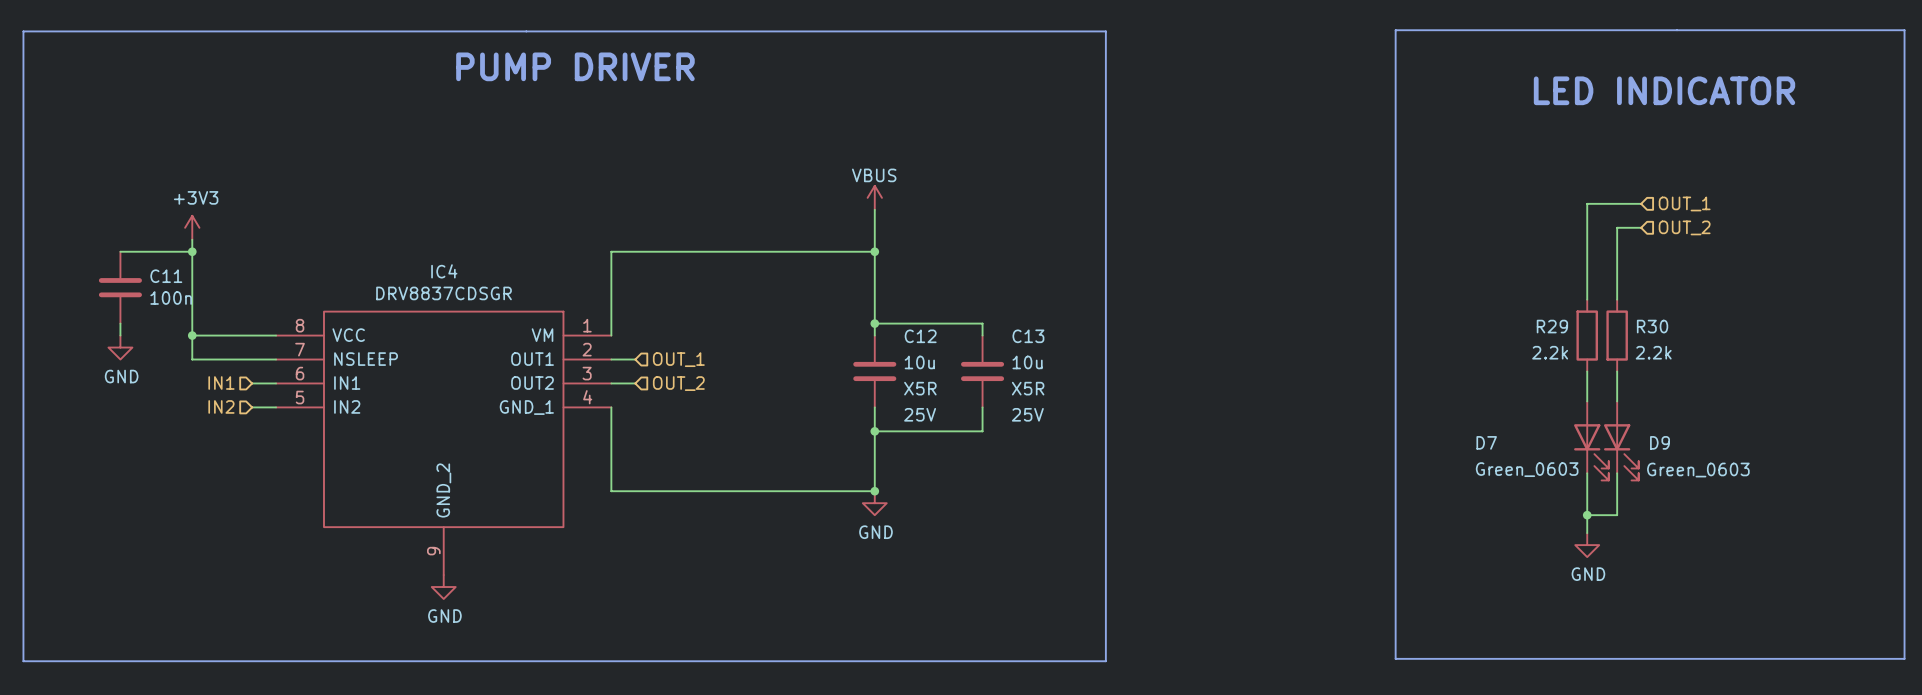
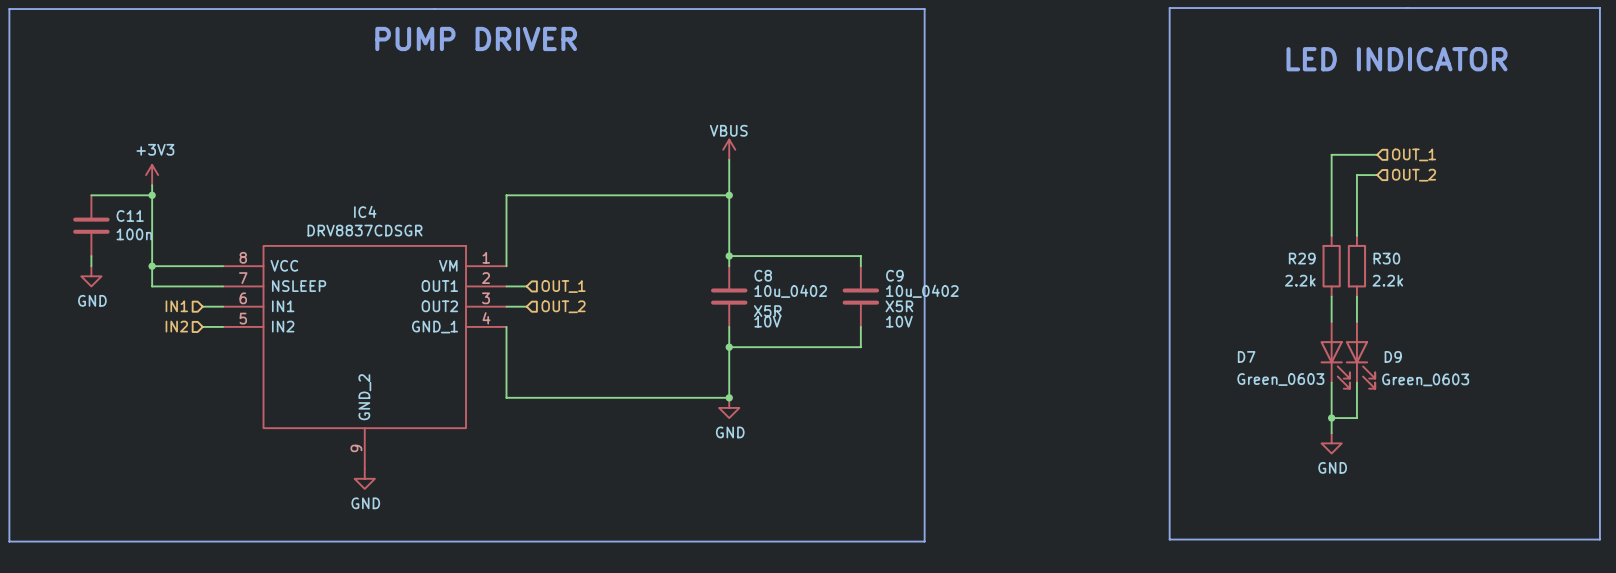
wire: (982, 323) (982, 335) -> (820, 256) (860, 256) (860, 266)
C12 name: C12 (920, 336) -> C8 (763, 275)
C12 value: 10u (919, 362) -> 10u_0402 (790, 291)
C13: 10u (982, 371) -> none
C9: none -> 10u_0402 (860, 296)
wire: (982, 407) (982, 431) -> (860, 326) (860, 347) (820, 347)
C12 text: 25V (920, 414) -> 10V (767, 321)

